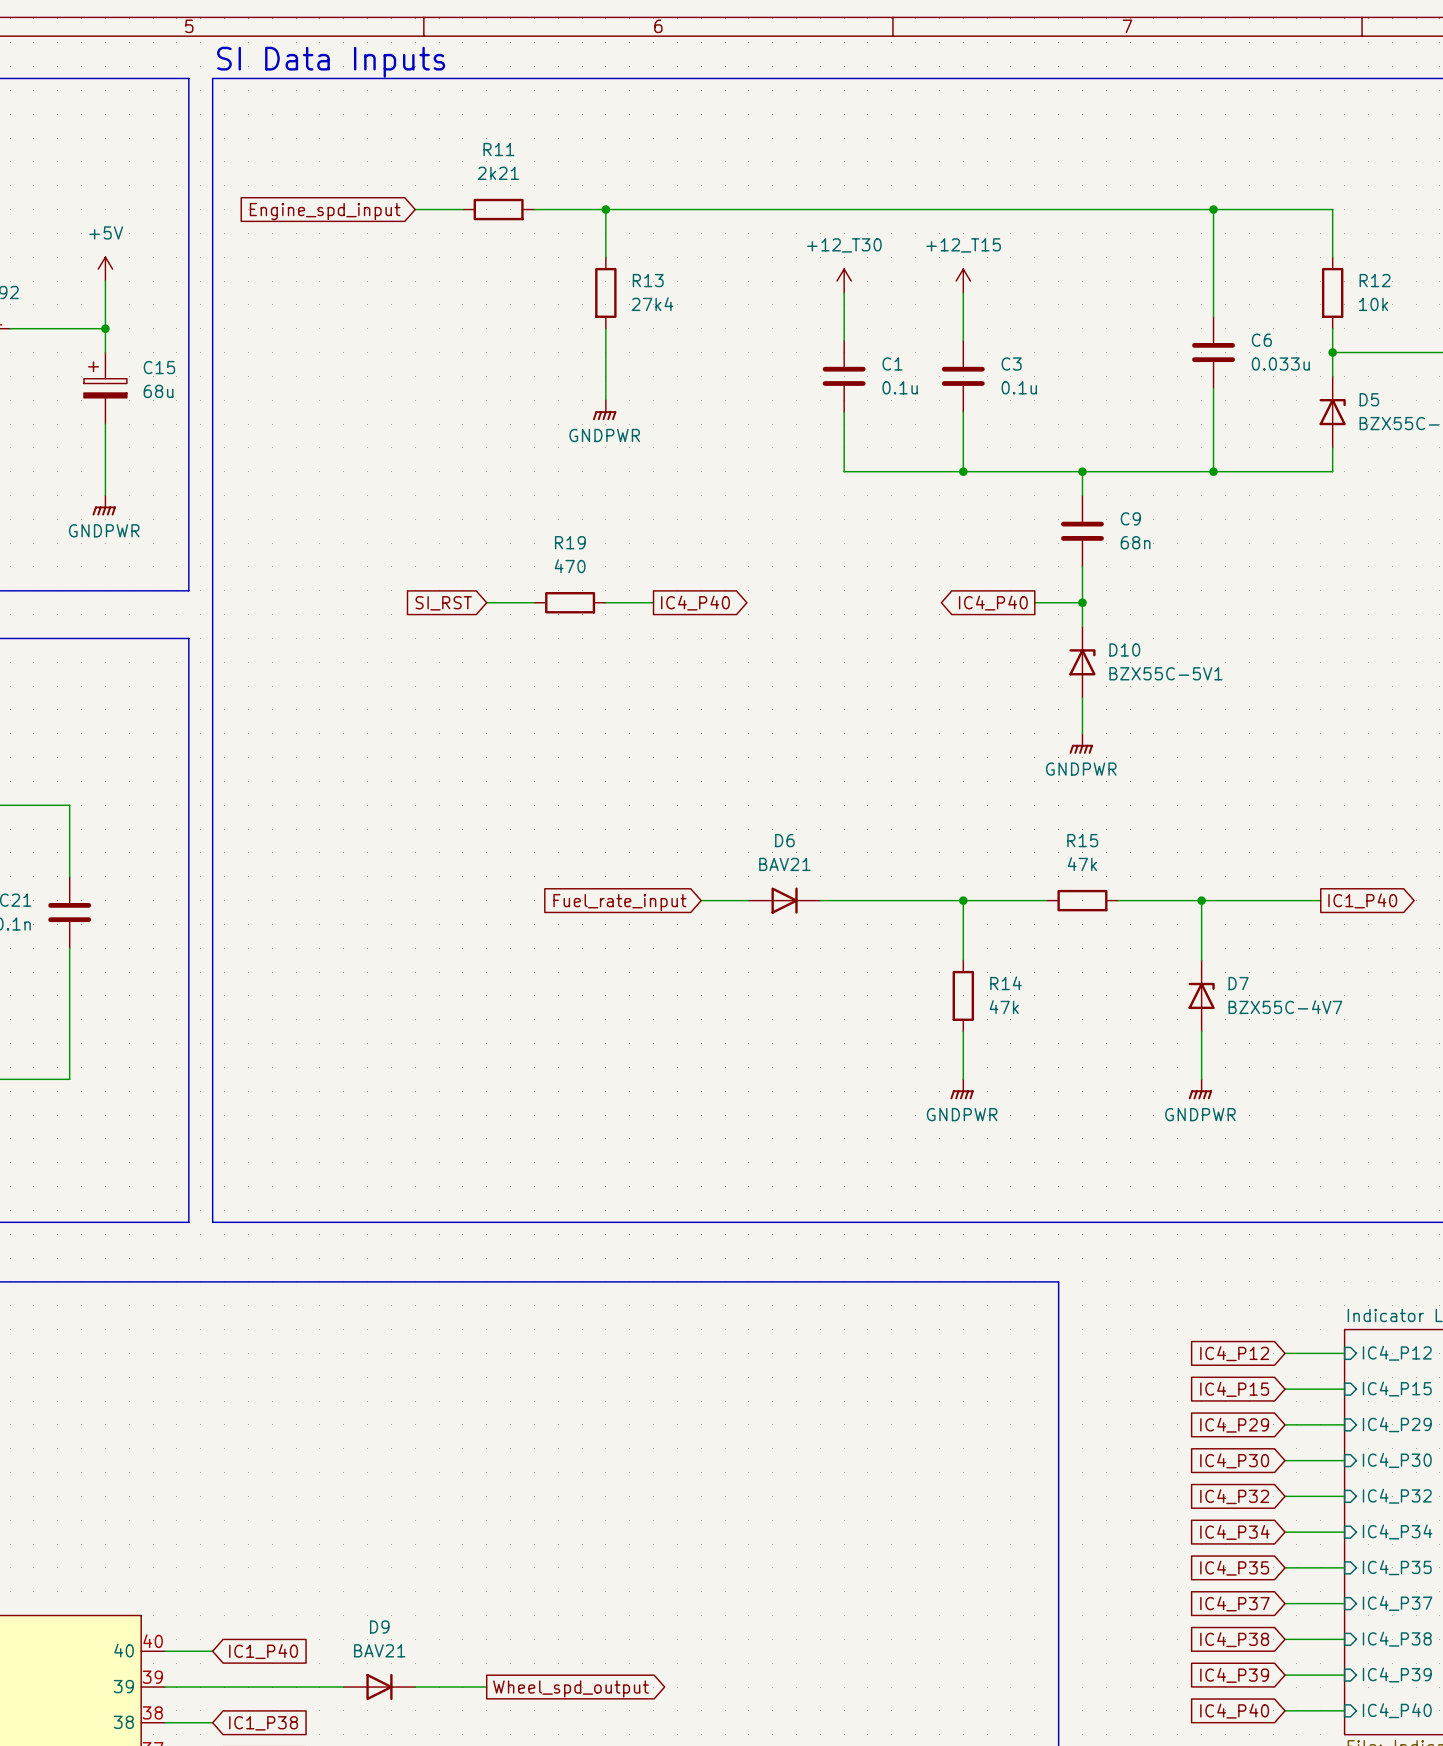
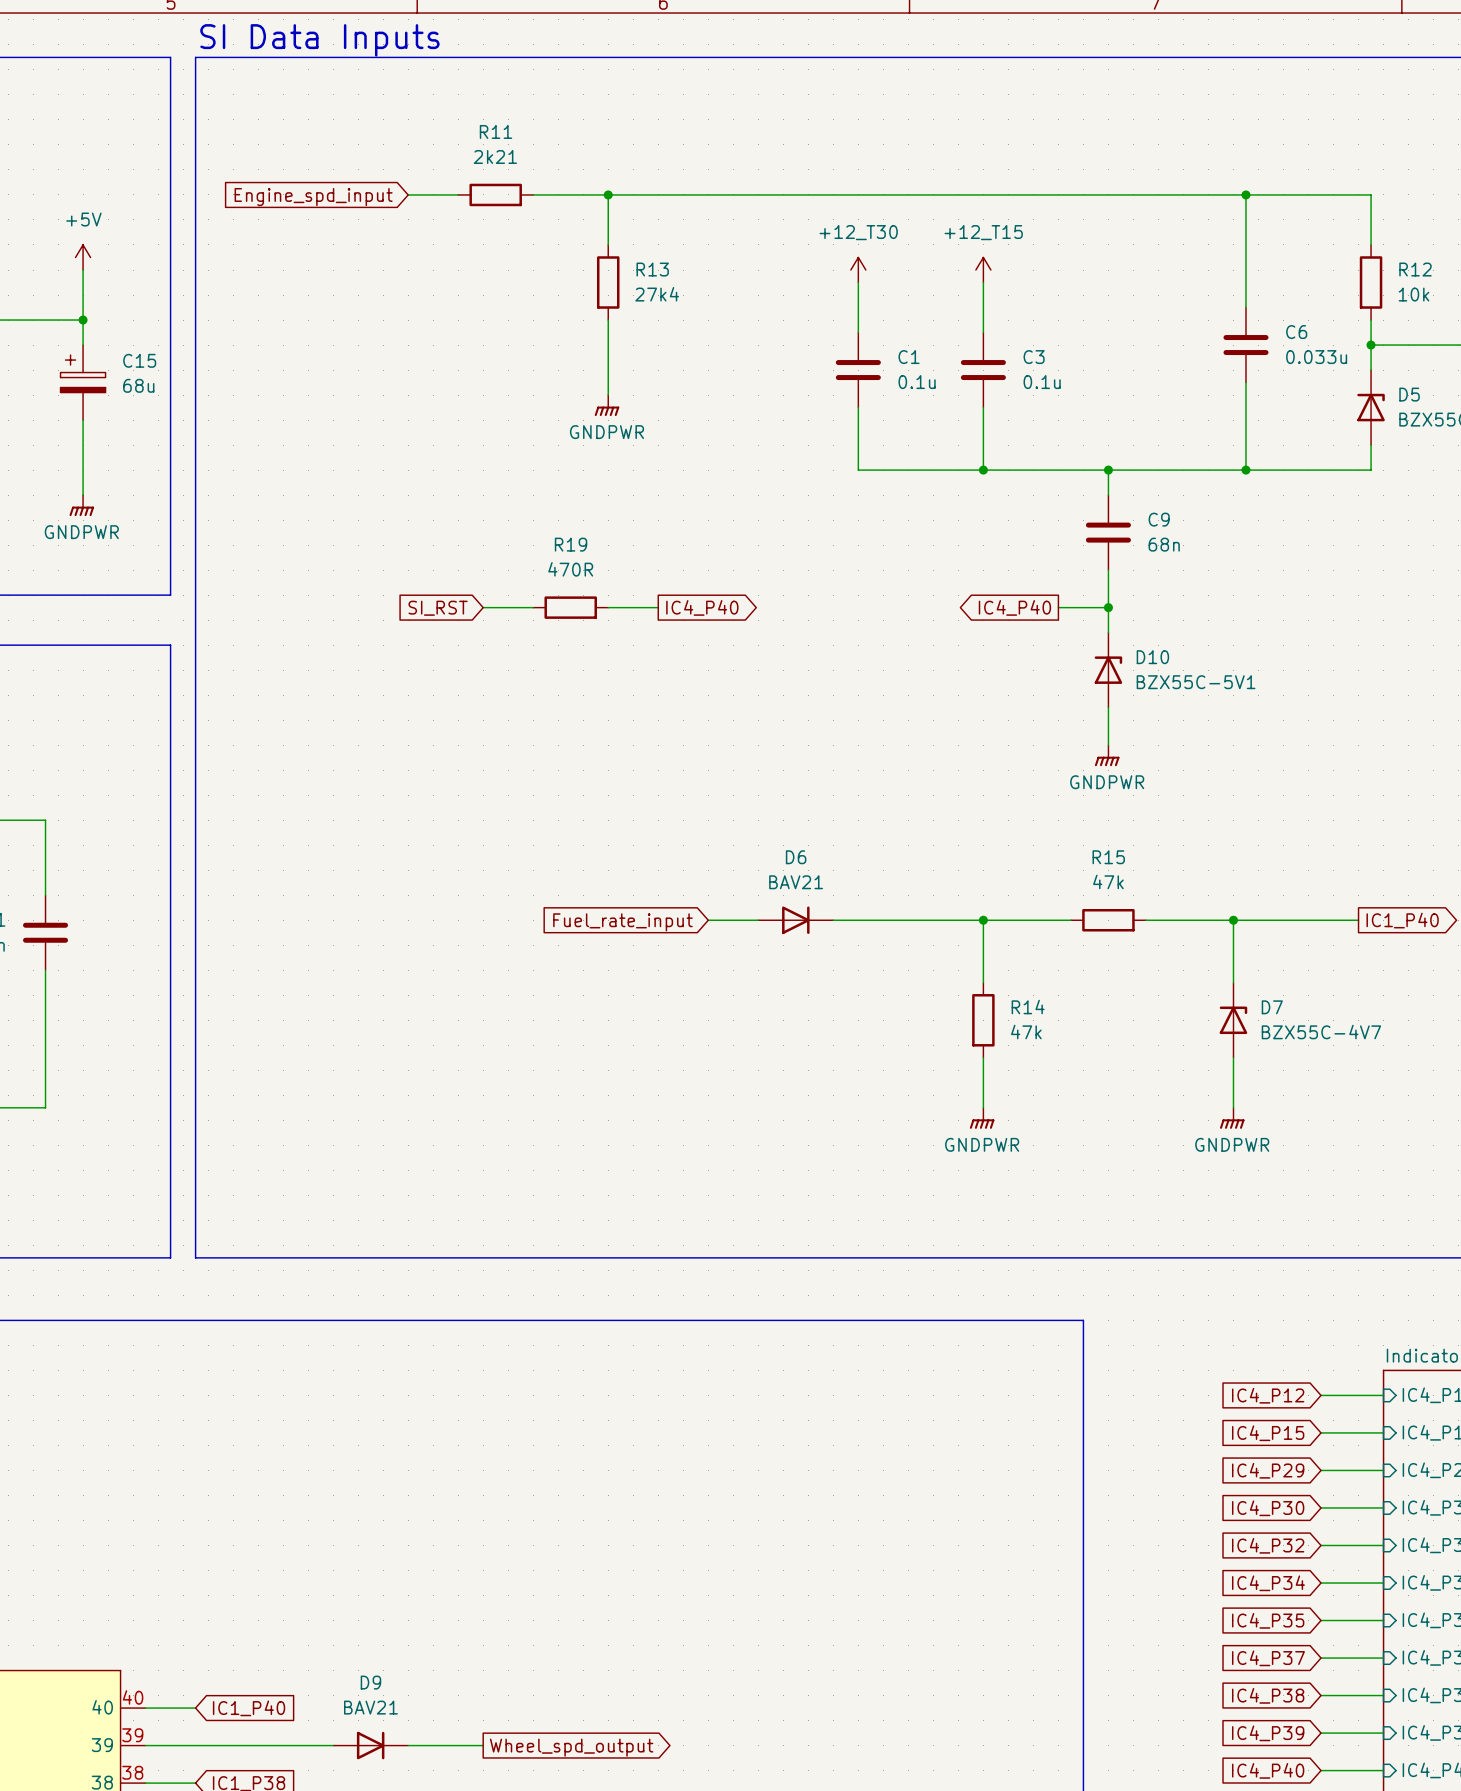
R19 value: 470 (570, 566) -> 470R (570, 569)

